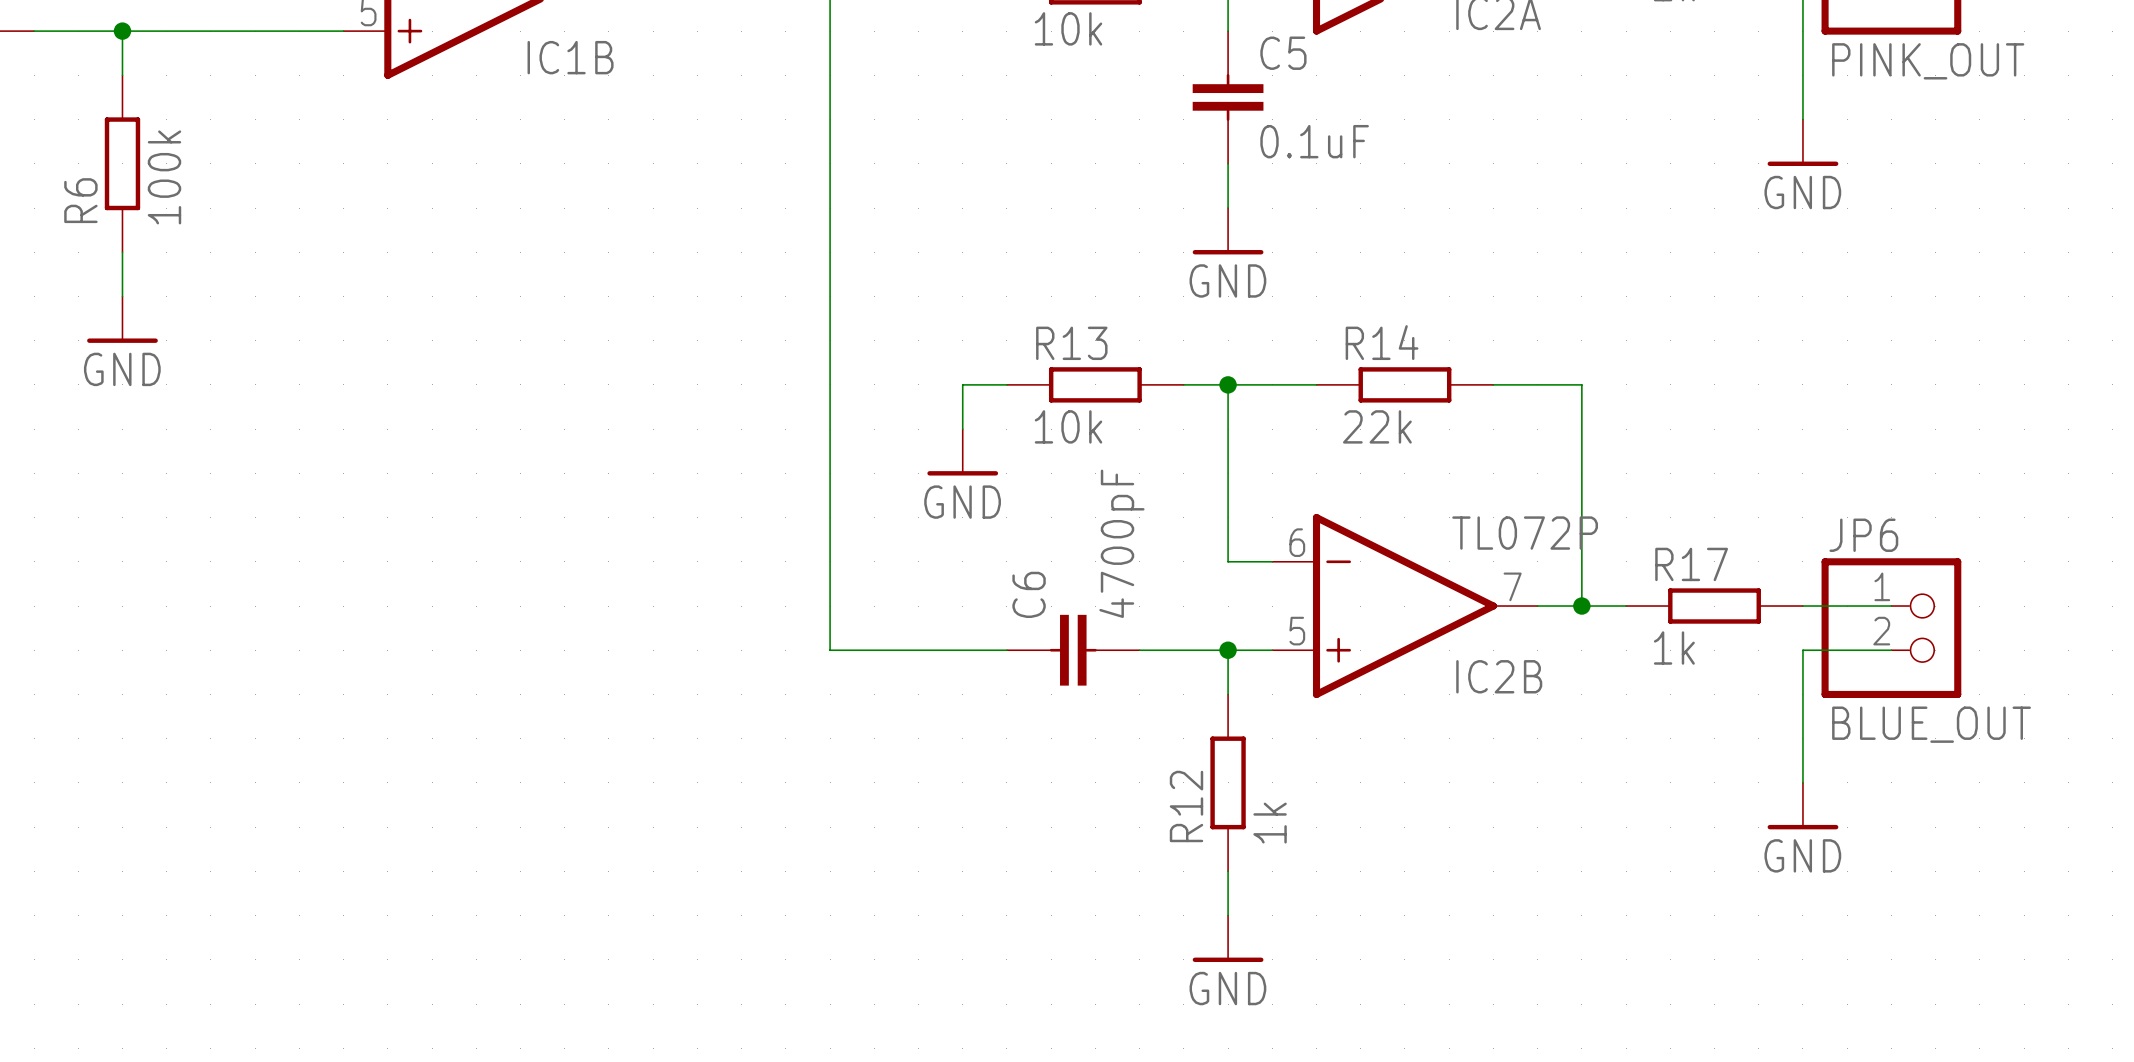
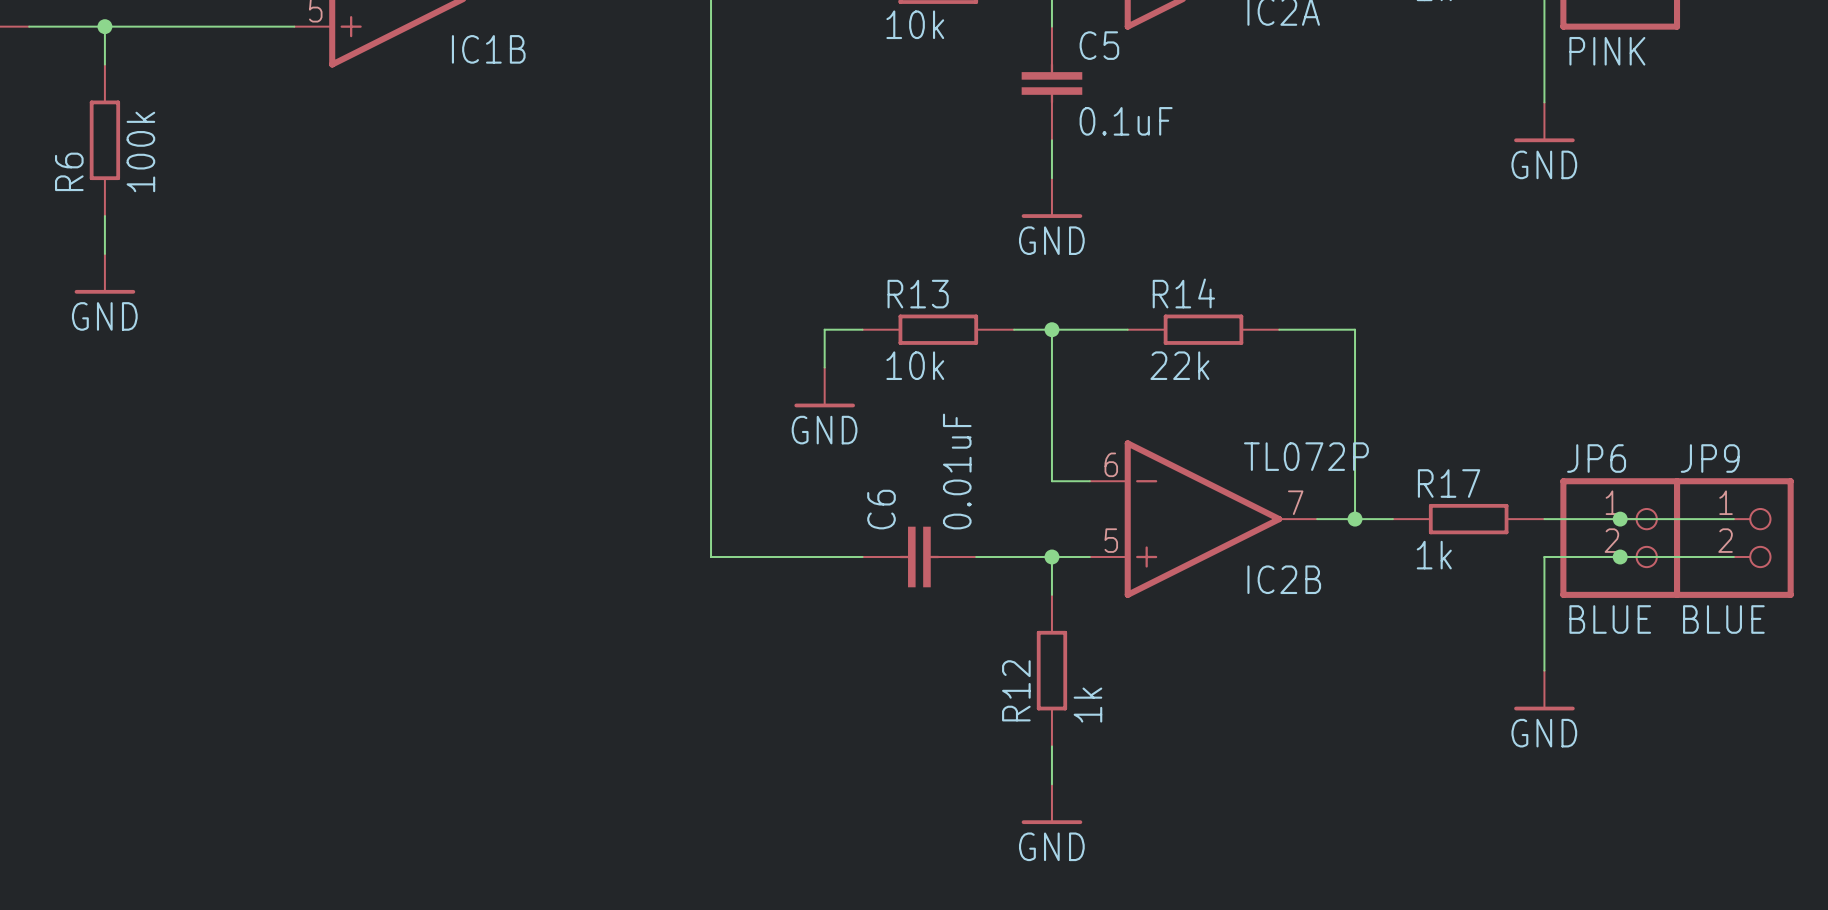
part value: PINK_OUT (1928, 61) -> PINK (1607, 51)
C6 value: 4700pF (1121, 543) -> 0.01uF (957, 471)
wire: none -> (1620, 519) (1733, 519)
junction: none -> (1620, 519)
JP9: none -> BLUE (1733, 538)
wire: none -> (1620, 556) (1733, 556)
junction: none -> (1620, 556)
JP6 value: BLUE_OUT (1931, 724) -> BLUE (1610, 619)

